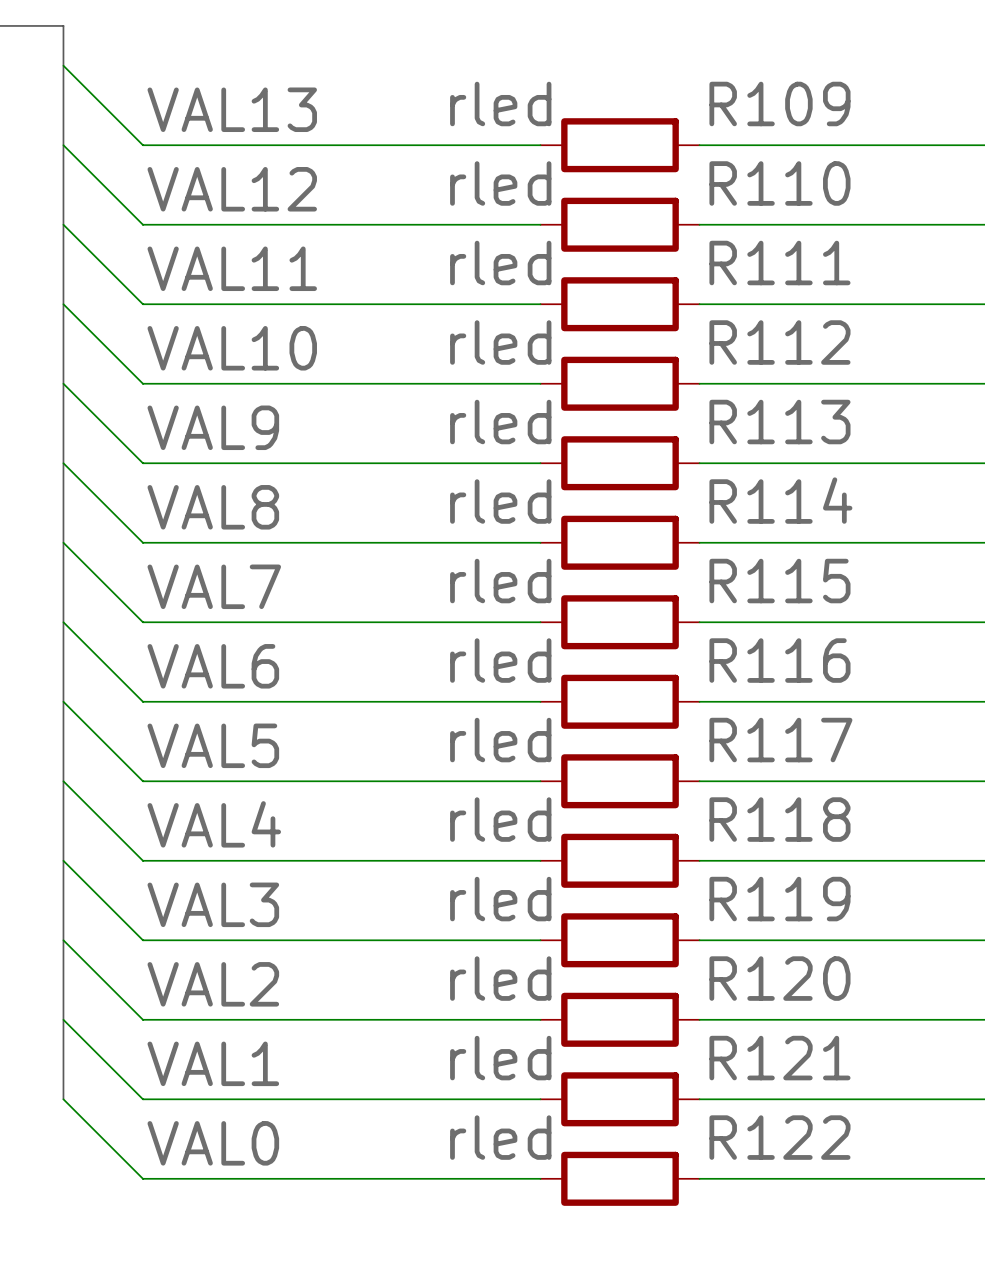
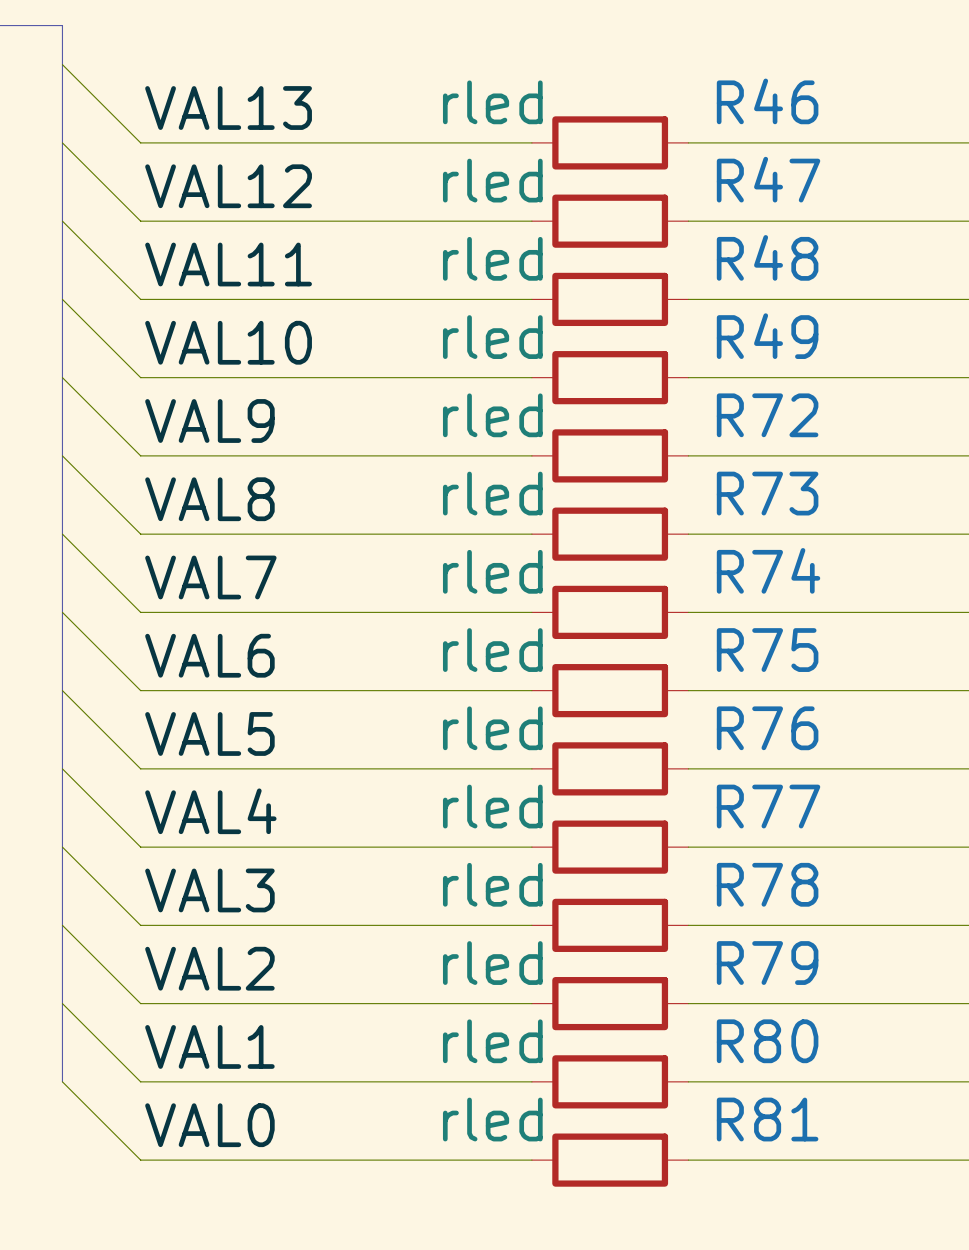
R109 name: R109 (779, 103) -> R46 (767, 101)
R110 name: R110 (779, 183) -> R47 (768, 179)
R111 name: R111 (779, 263) -> R48 (767, 257)
R112 name: R112 (779, 342) -> R49 (767, 336)
R113 name: R113 (779, 422) -> R72 (767, 415)
R114 name: R114 (780, 500) -> R73 (767, 493)
R115 name: R115 (779, 581) -> R74 (768, 570)
R116 name: R116 (779, 660) -> R75 (767, 650)
R117 name: R117 (780, 740) -> R76 (767, 728)
R118 name: R118 (779, 819) -> R77 (768, 806)
R119 name: R119 (779, 899) -> R78 (767, 884)
R120 name: R120 (779, 978) -> R79 (767, 963)
R121 name: R121 (779, 1058) -> R80 (767, 1041)
R122 name: R122 (779, 1137) -> R81 (767, 1119)

